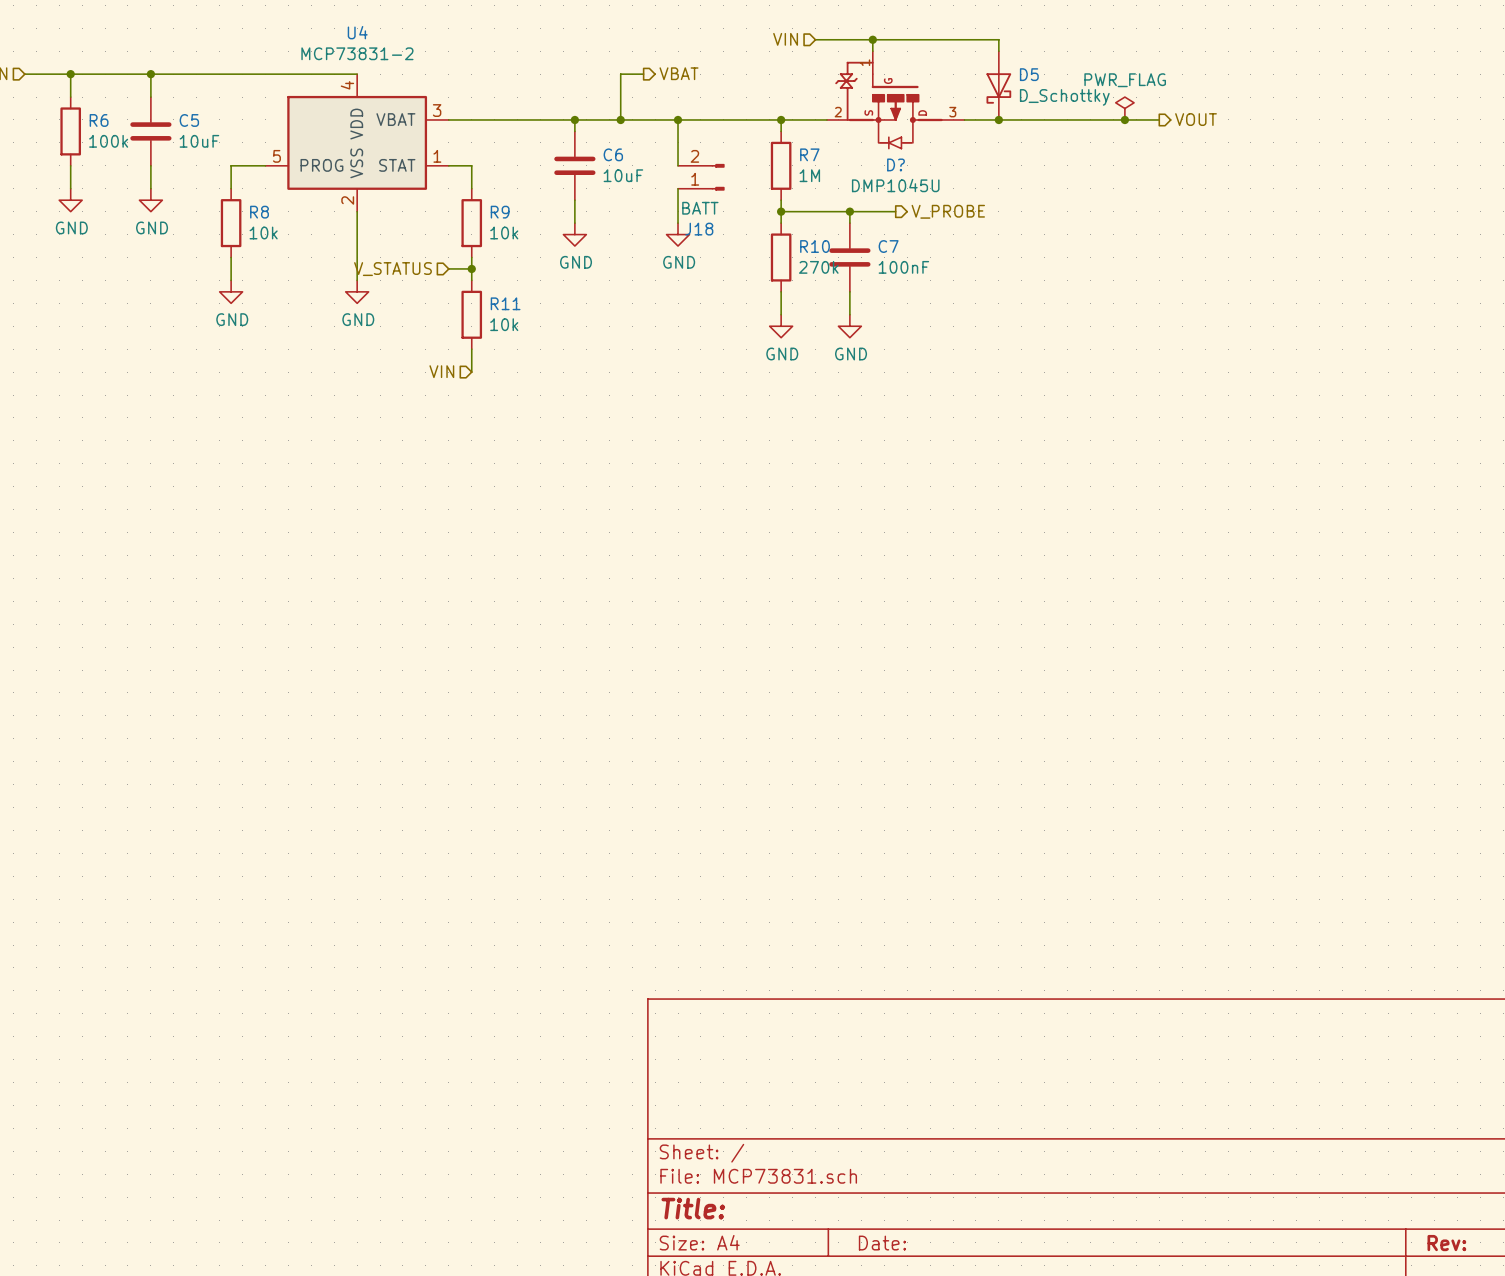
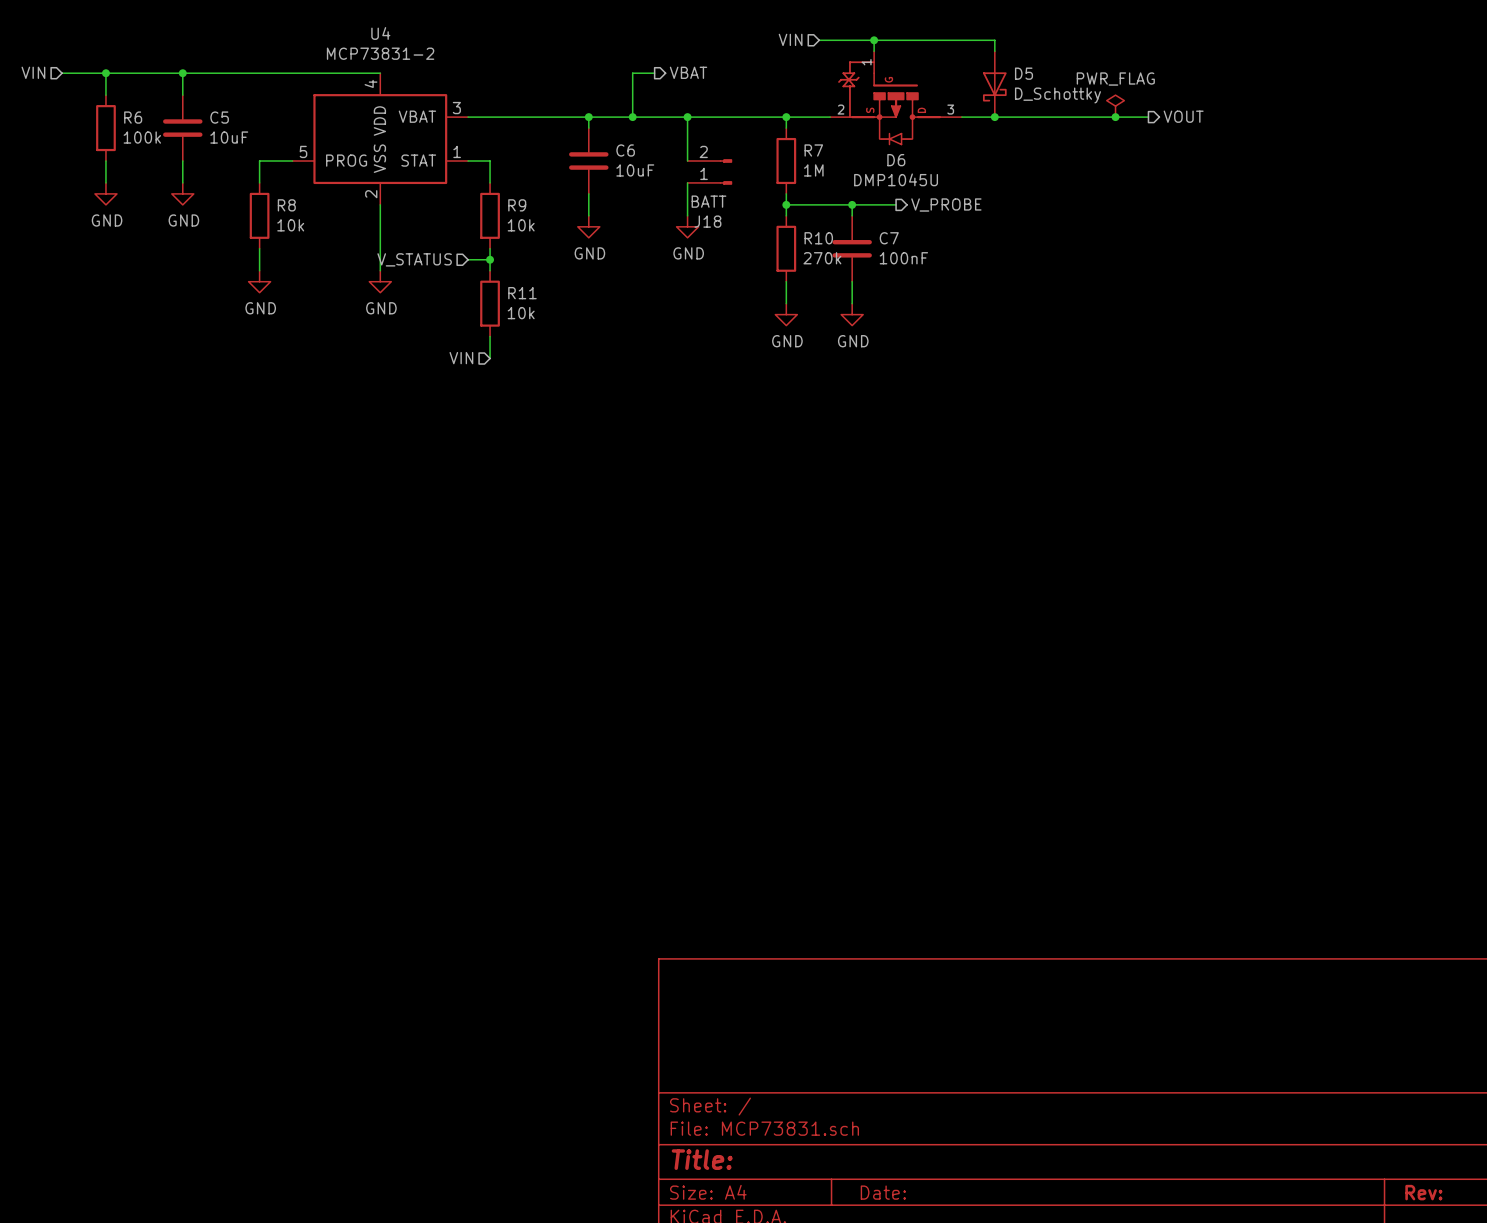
D? name: D? (895, 164) -> D6 (896, 160)

